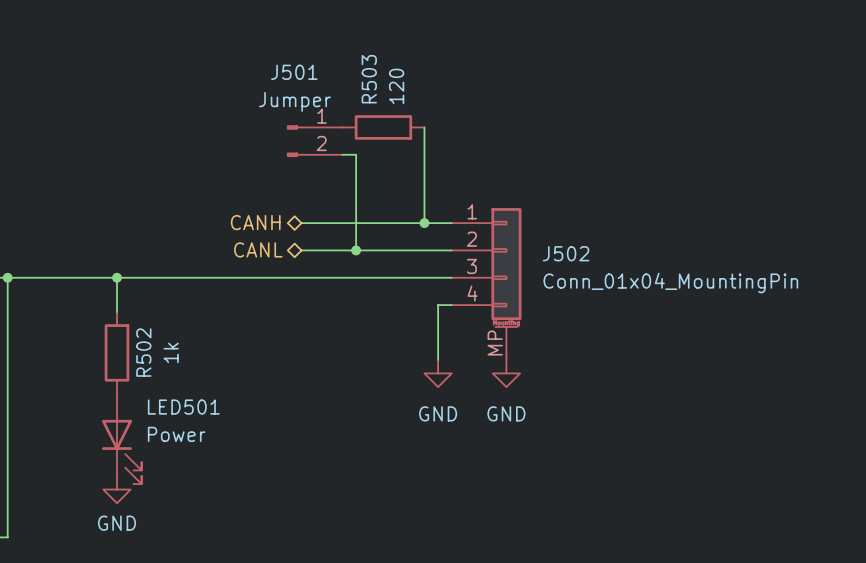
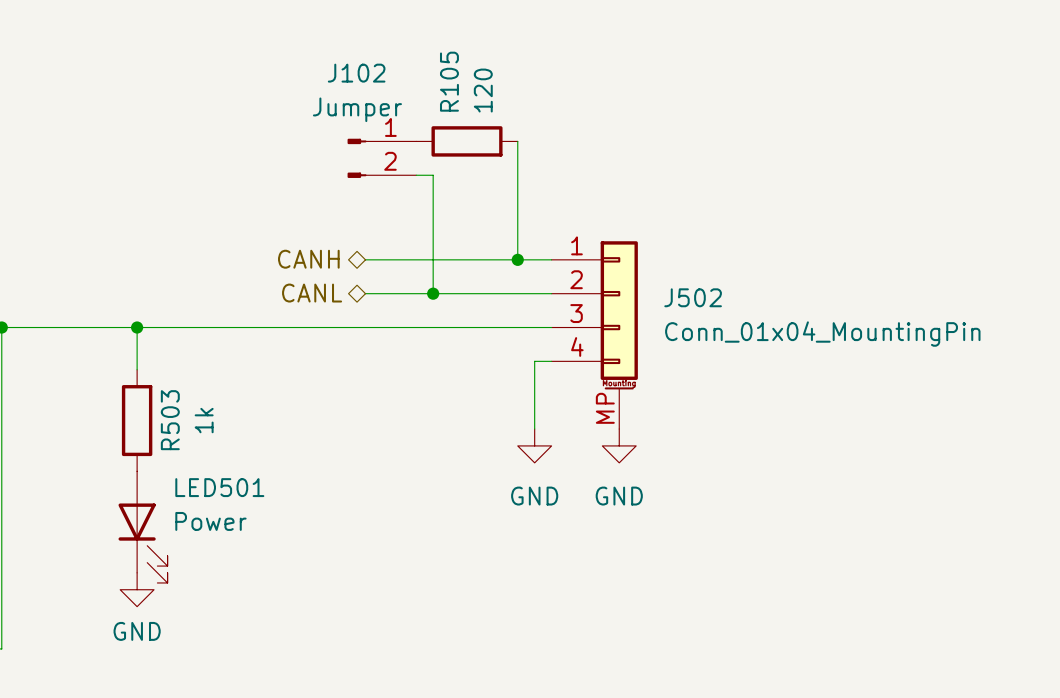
J501 name: J501 (294, 72) -> J102 (356, 73)
R503 name: R503 (369, 79) -> R105 (449, 81)
R502 name: R502 (143, 352) -> R503 (170, 420)

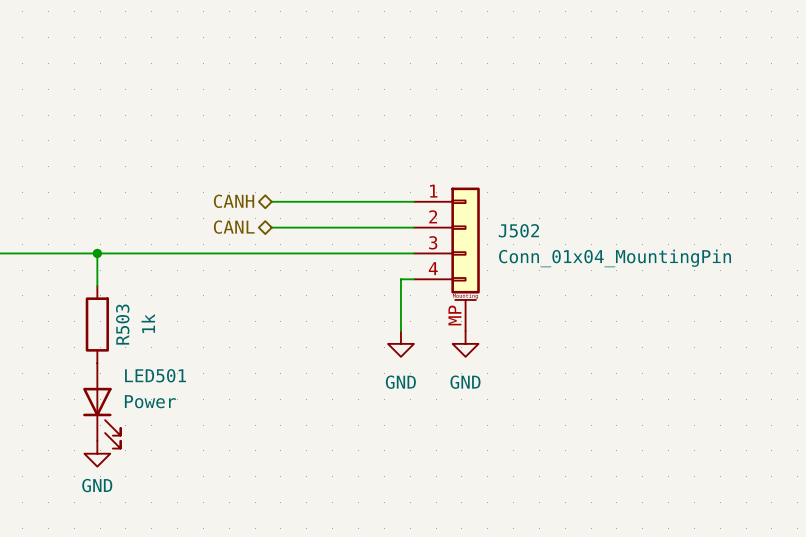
R105: 120 (467, 141) -> none
wire: (517, 141) (517, 259) -> none
J102: Jumper (381, 158) -> none
wire: (416, 175) (433, 175) (433, 293) -> none
junction: (517, 259) -> none
junction: (433, 293) -> none

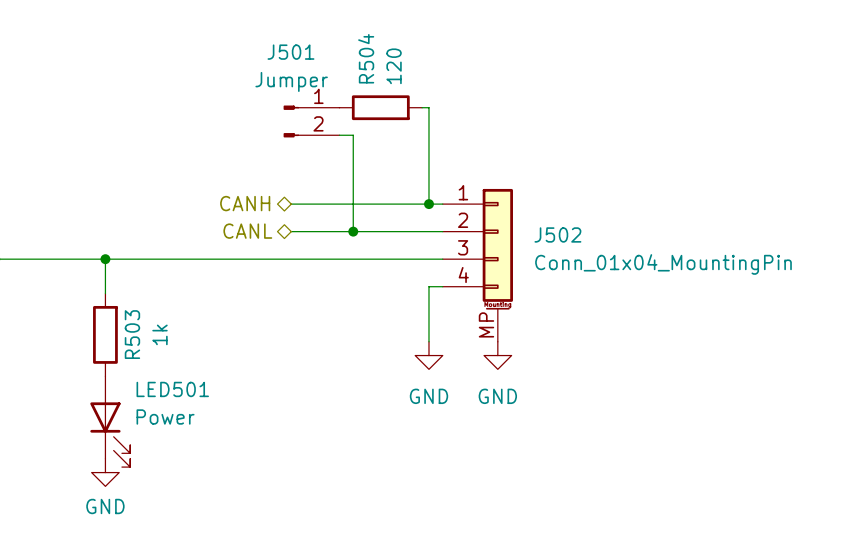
R504: none -> 120 (380, 107)
wire: none -> (422, 107) (428, 107) (428, 204)
J501: none -> Jumper (311, 121)
wire: none -> (339, 135) (353, 135) (353, 231)
junction: none -> (428, 204)
junction: none -> (353, 231)

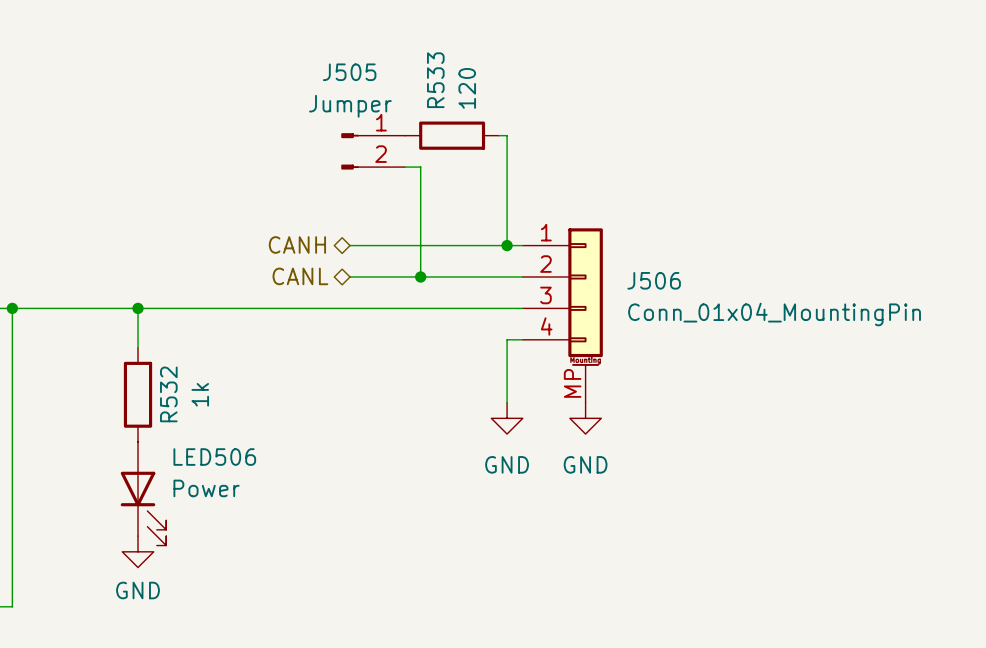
J501 name: J501 (290, 52) -> J505 (349, 72)
R504 name: R504 (366, 58) -> R533 (435, 80)
J502 name: J502 (557, 234) -> J506 (654, 280)
R503 name: R503 (132, 334) -> R532 (168, 394)
LED501 name: LED501 (172, 389) -> LED506 (214, 457)

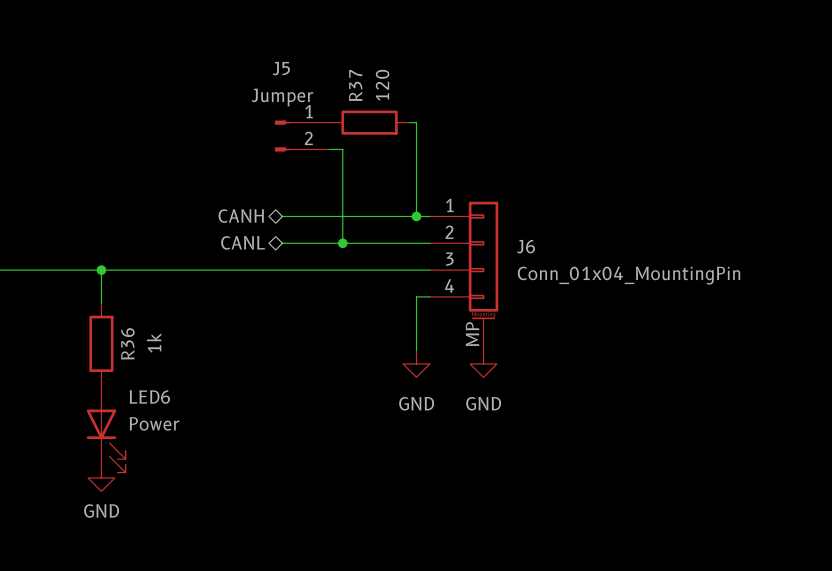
J505 name: J505 (349, 72) -> J5 (281, 68)
R533 name: R533 (435, 80) -> R37 (355, 85)
J506 name: J506 (654, 280) -> J6 (525, 246)
R532 name: R532 (168, 394) -> R36 (127, 343)
LED506 name: LED506 (214, 457) -> LED6 (149, 397)

